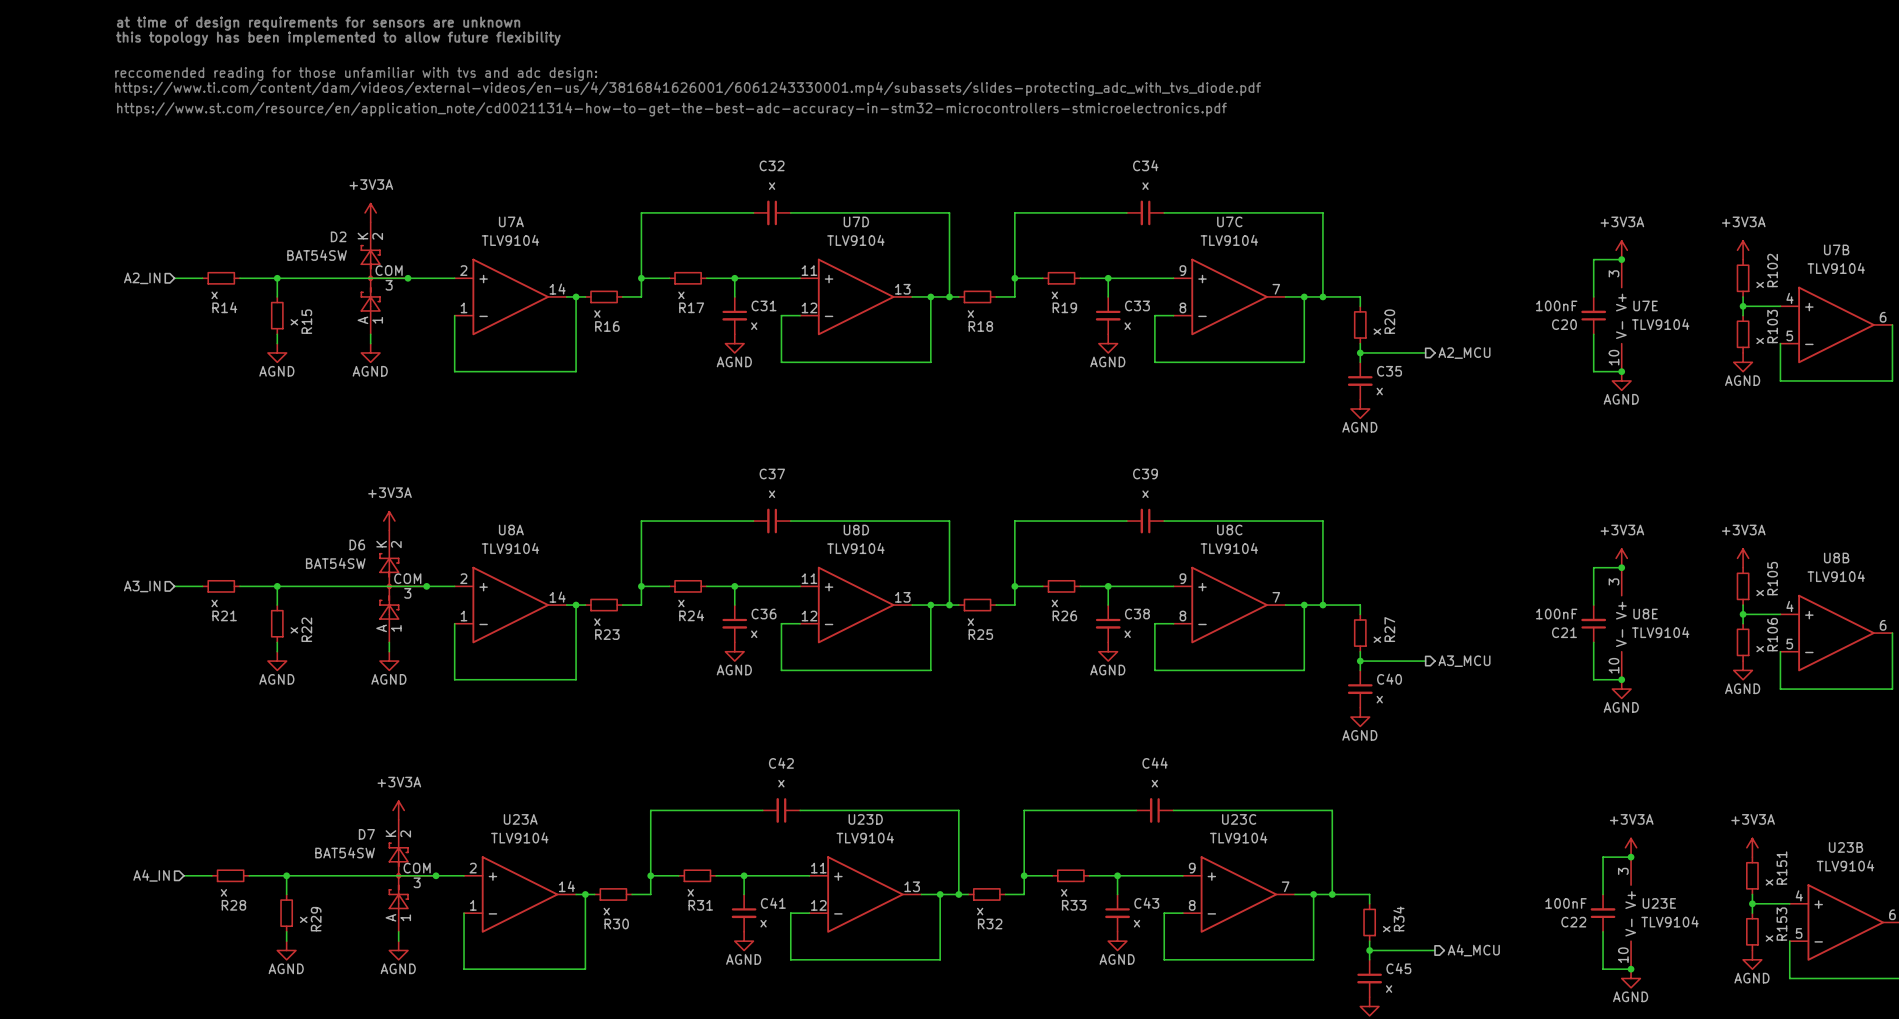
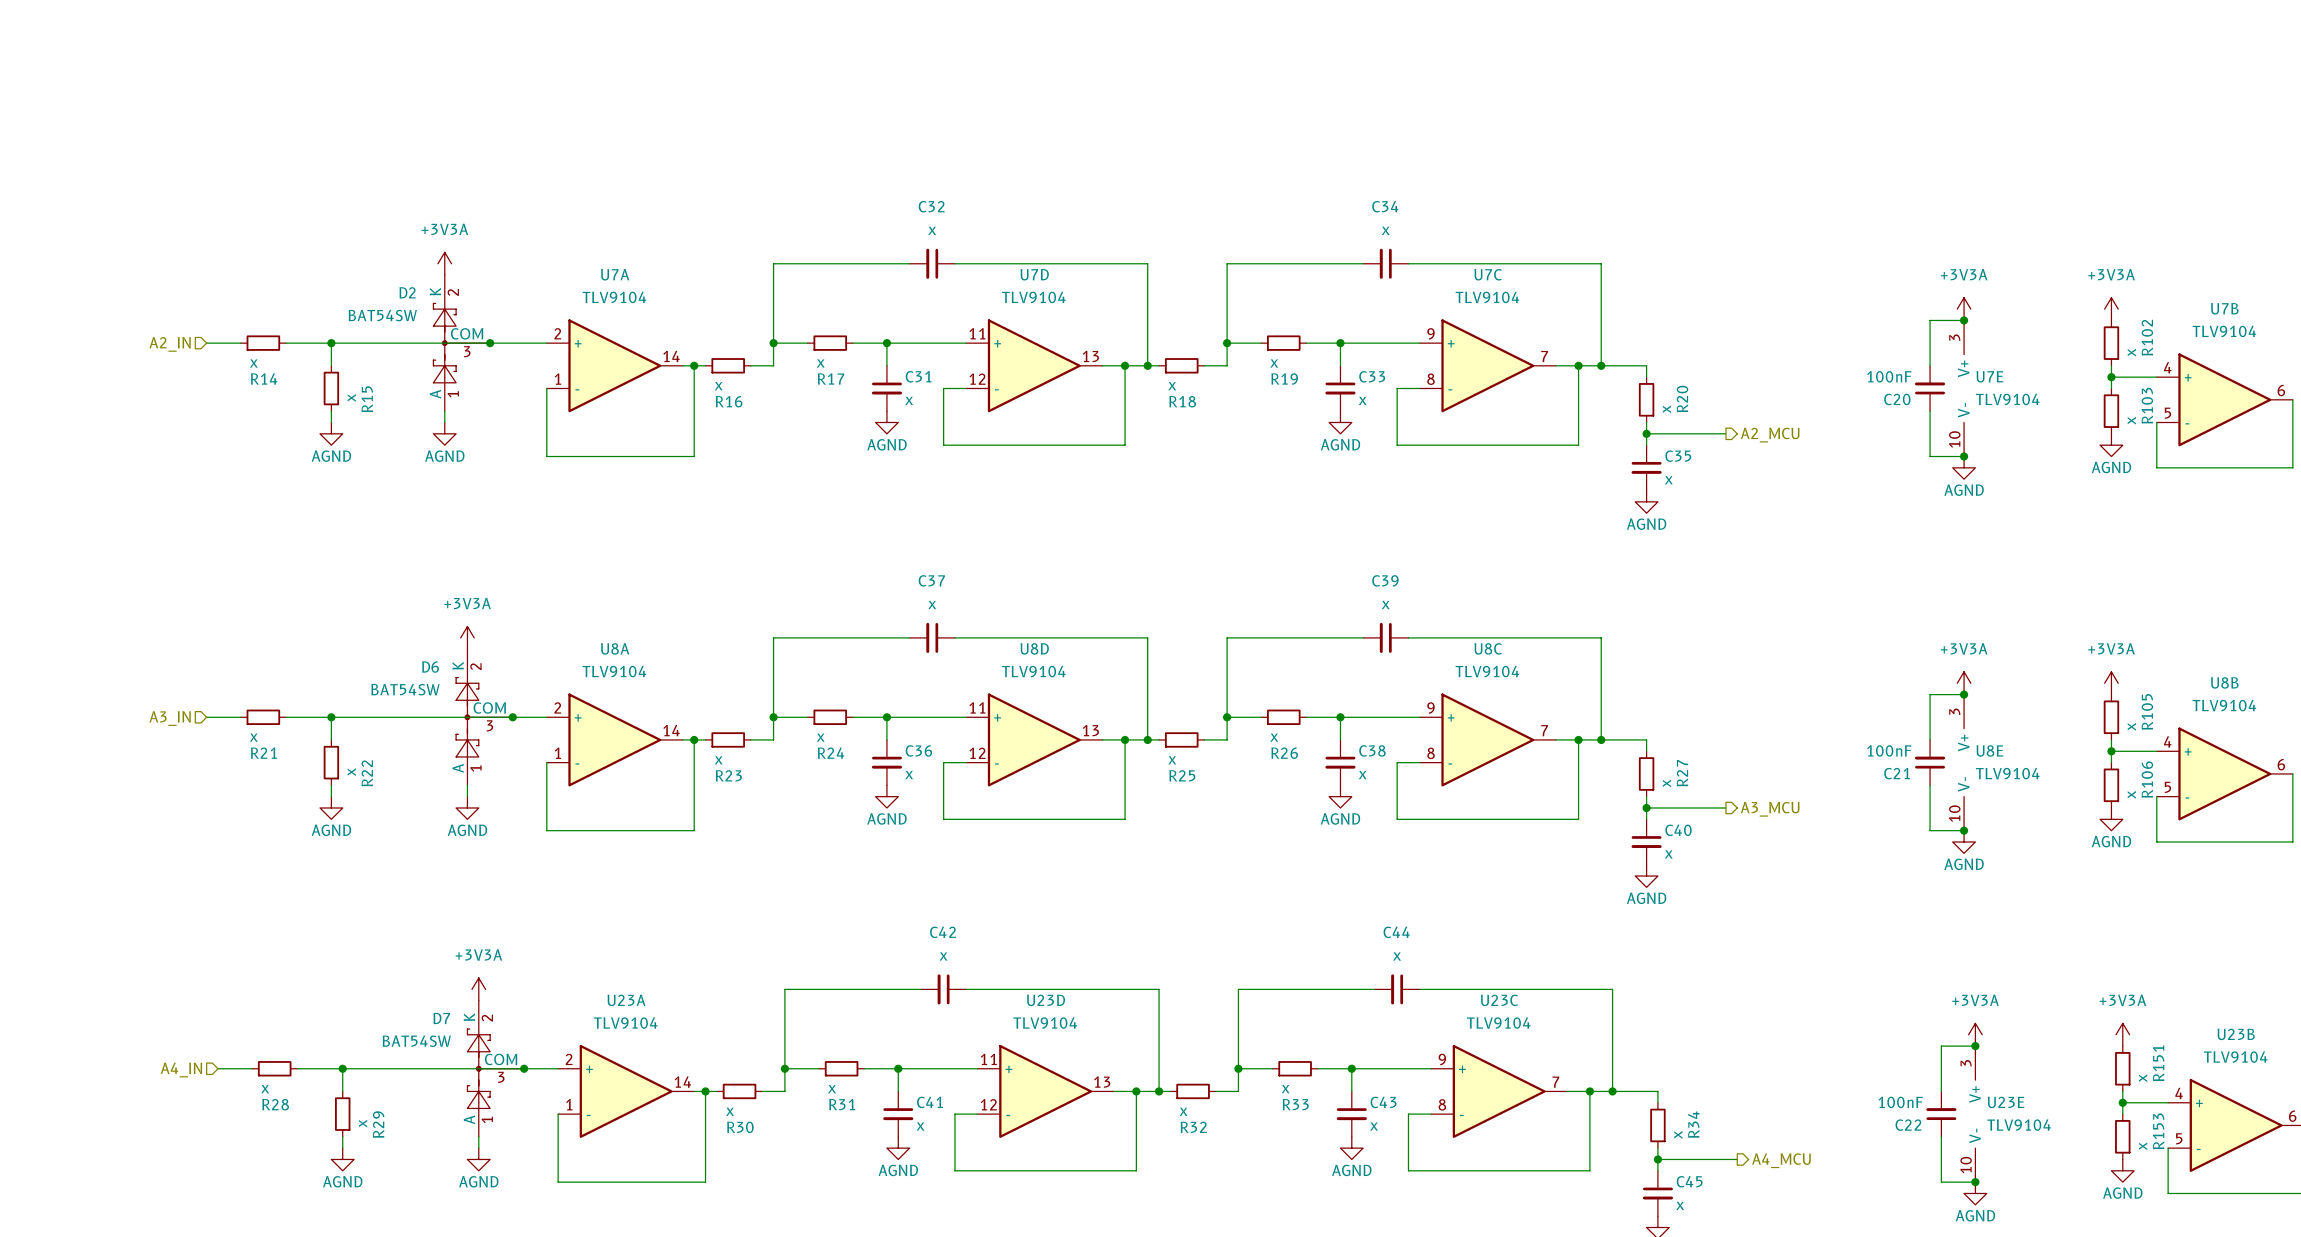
text: at time of design requirements for sensors are unknown (318, 23) -> none
text: this topology has been implemented to allow future flexibility (338, 38) -> none
text: reccomended reading for those unfamiliar with tvs and adc design: (356, 74) -> none
text: https://www.ti.com/content/dam/videos/external-videos/en-us/4/3816841626001/6061243330001.mp4/subassets/slides-protecting_adc_with_tvs_diode.pdf (688, 88) -> none
text: https://www.st.com/resource/en/application_note/cd00211314-how-to-get-the-best-adc-accuracy-in-stm32-microcontrollers-stmicroelectronics.pdf (671, 109) -> none

